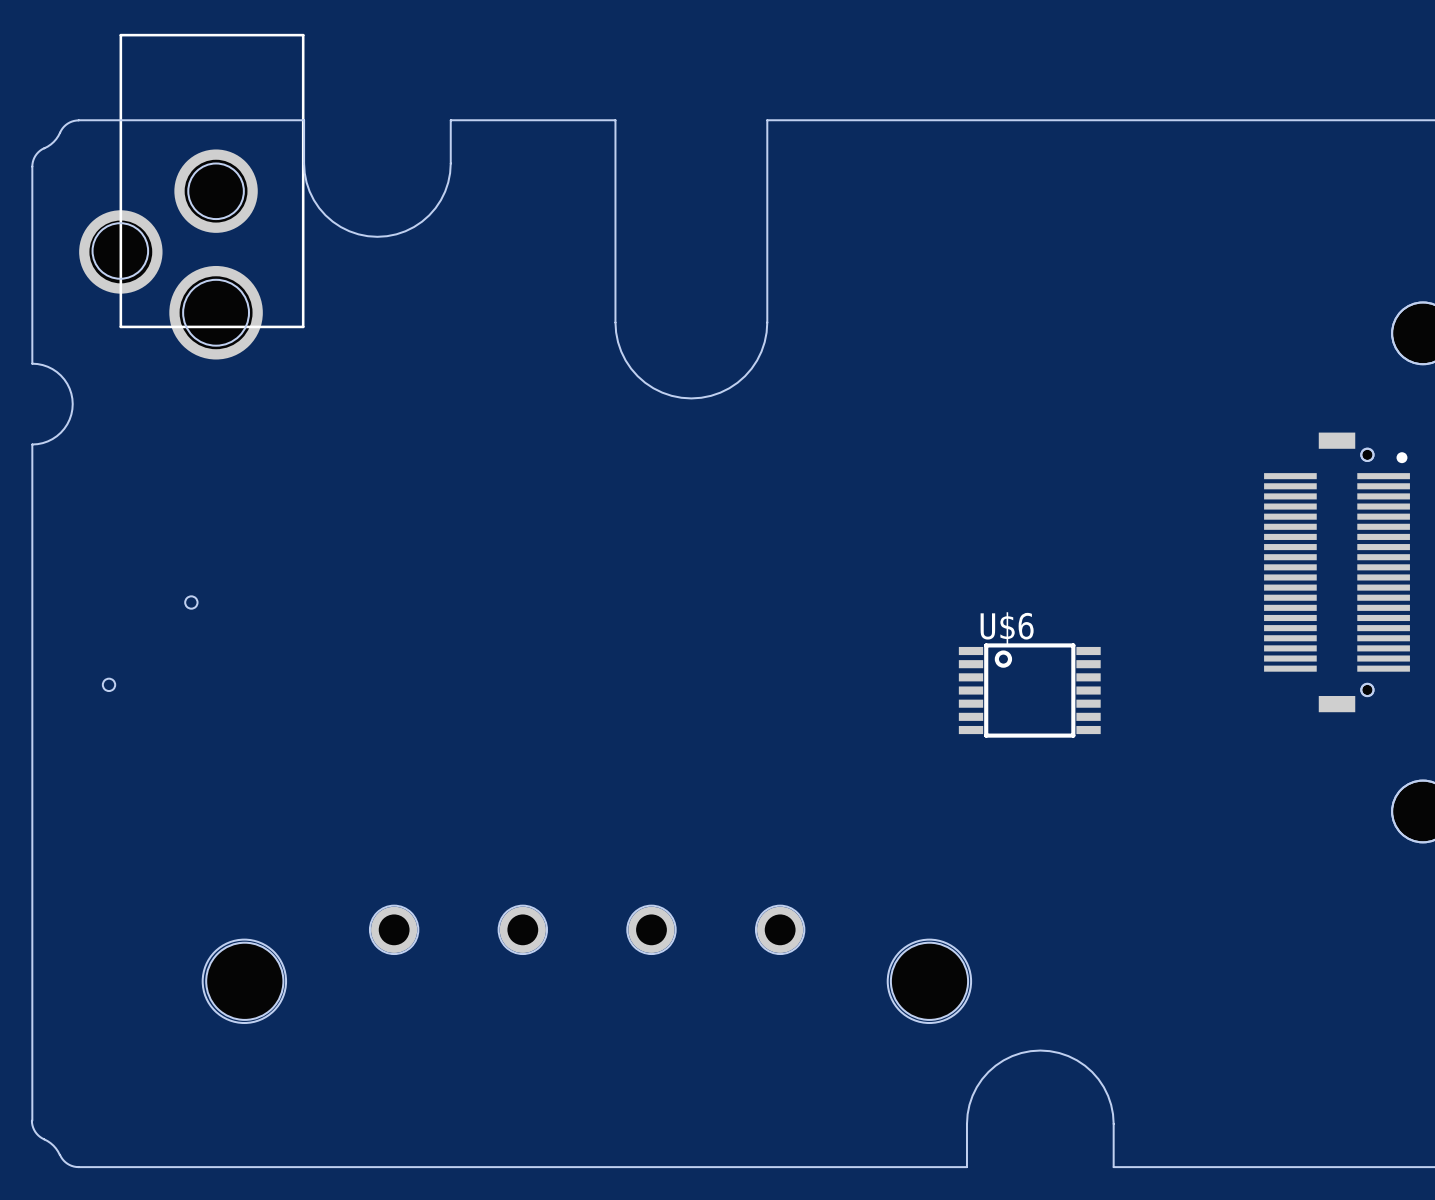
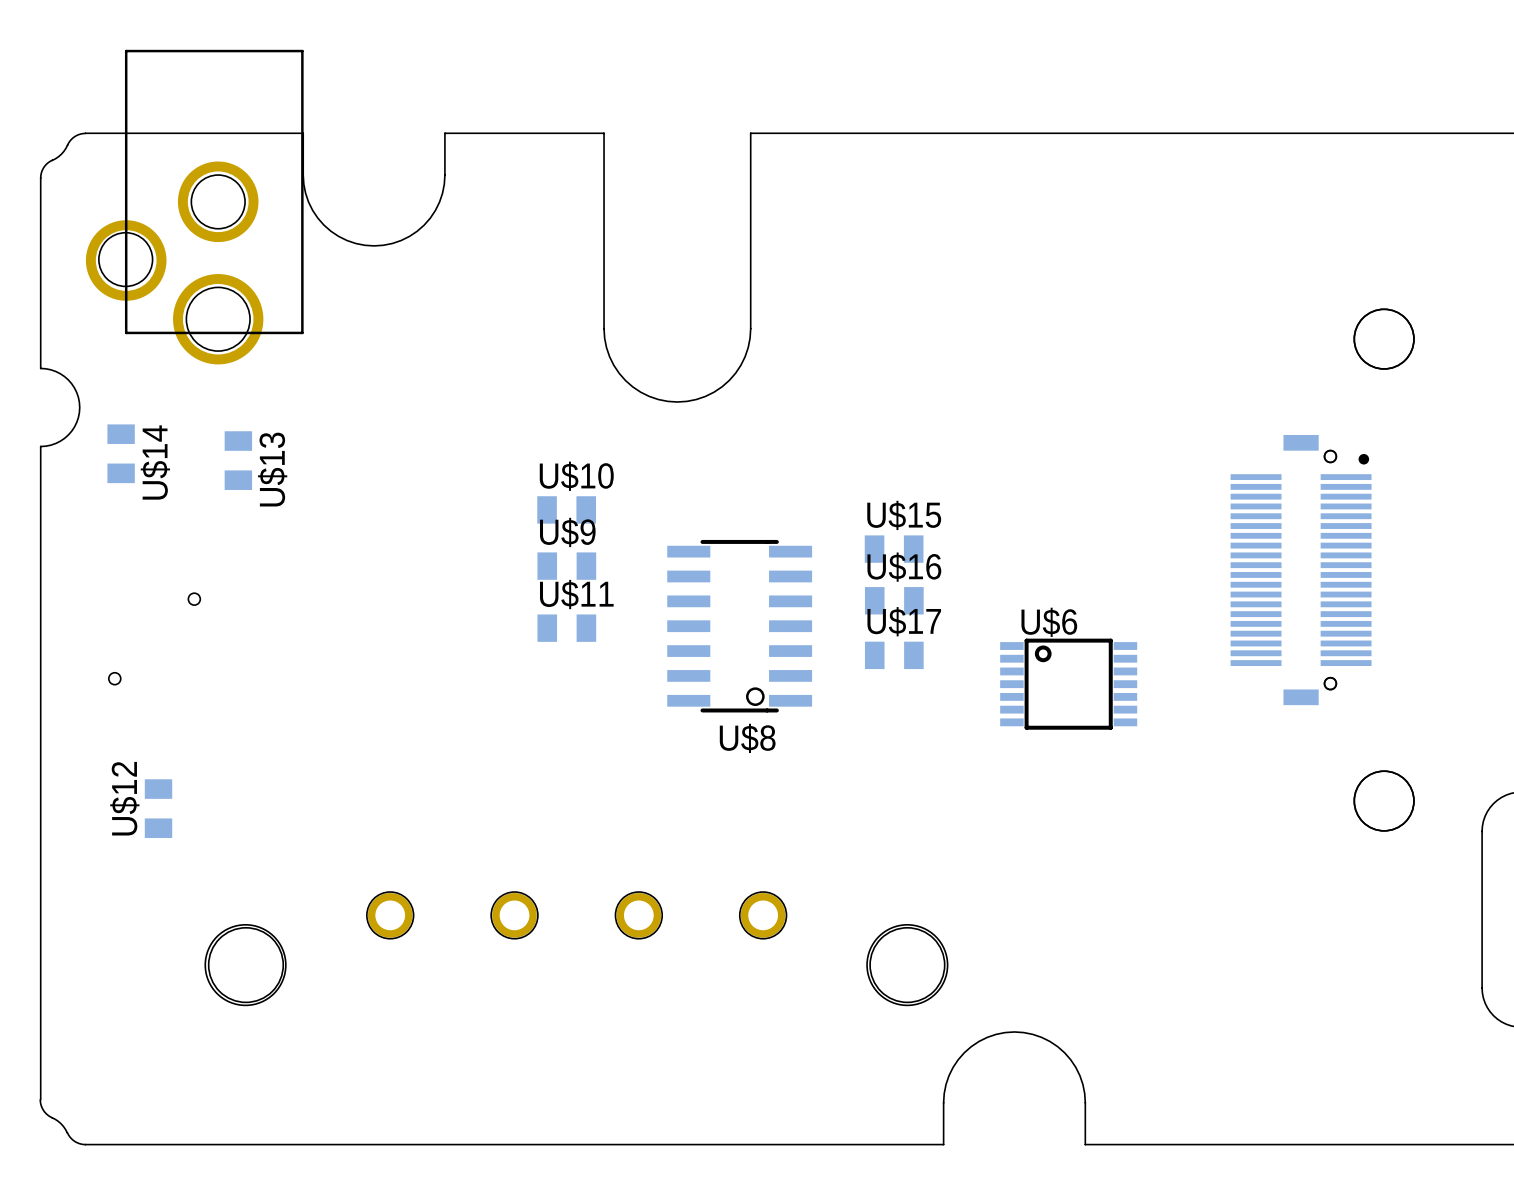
U$14: none -> (121, 453)
U$13: none -> (238, 460)
U$10: none -> (566, 509)
U$15: none -> (894, 549)
U$9: none -> (566, 566)
U$16: none -> (894, 600)
U$8: none -> (739, 626)
U$11: none -> (566, 628)
U$17: none -> (894, 655)
U$6 position: (1029, 690) -> (1068, 684)
U$12: none -> (158, 808)

